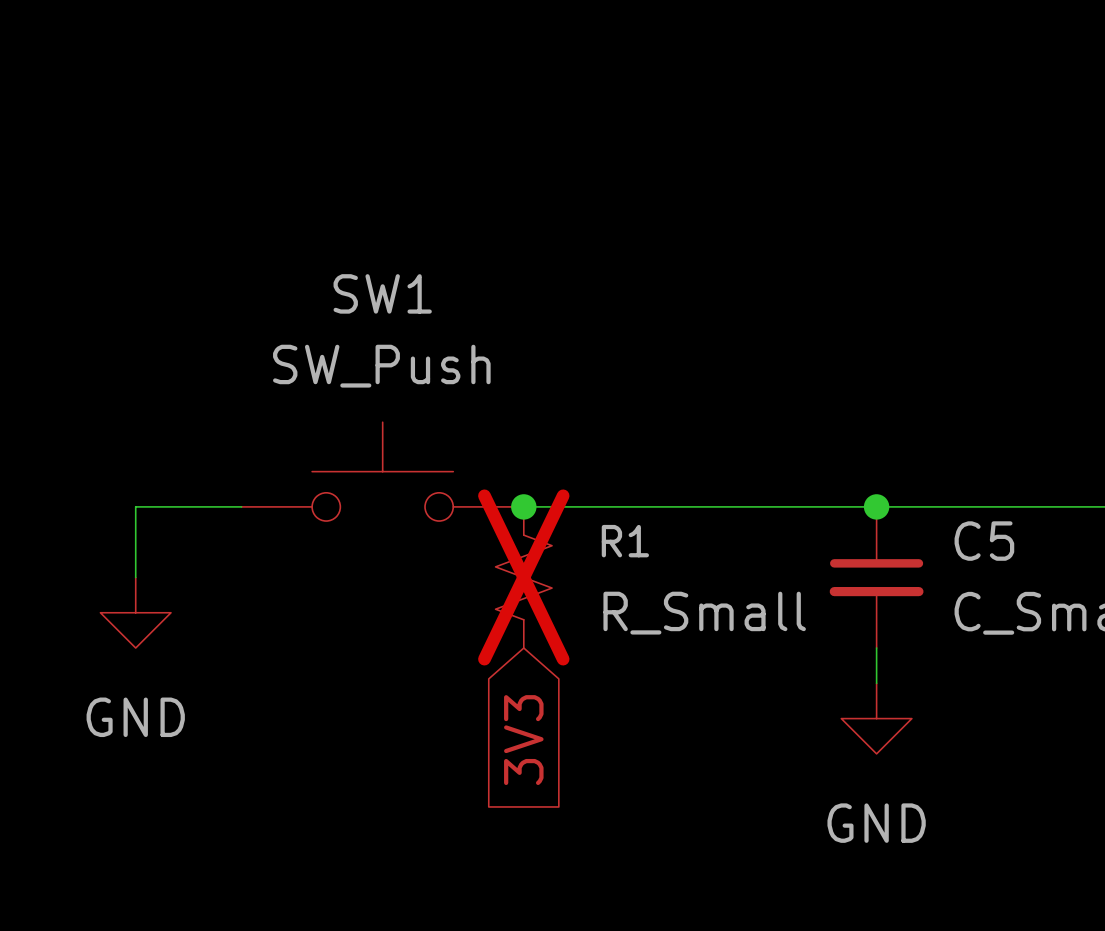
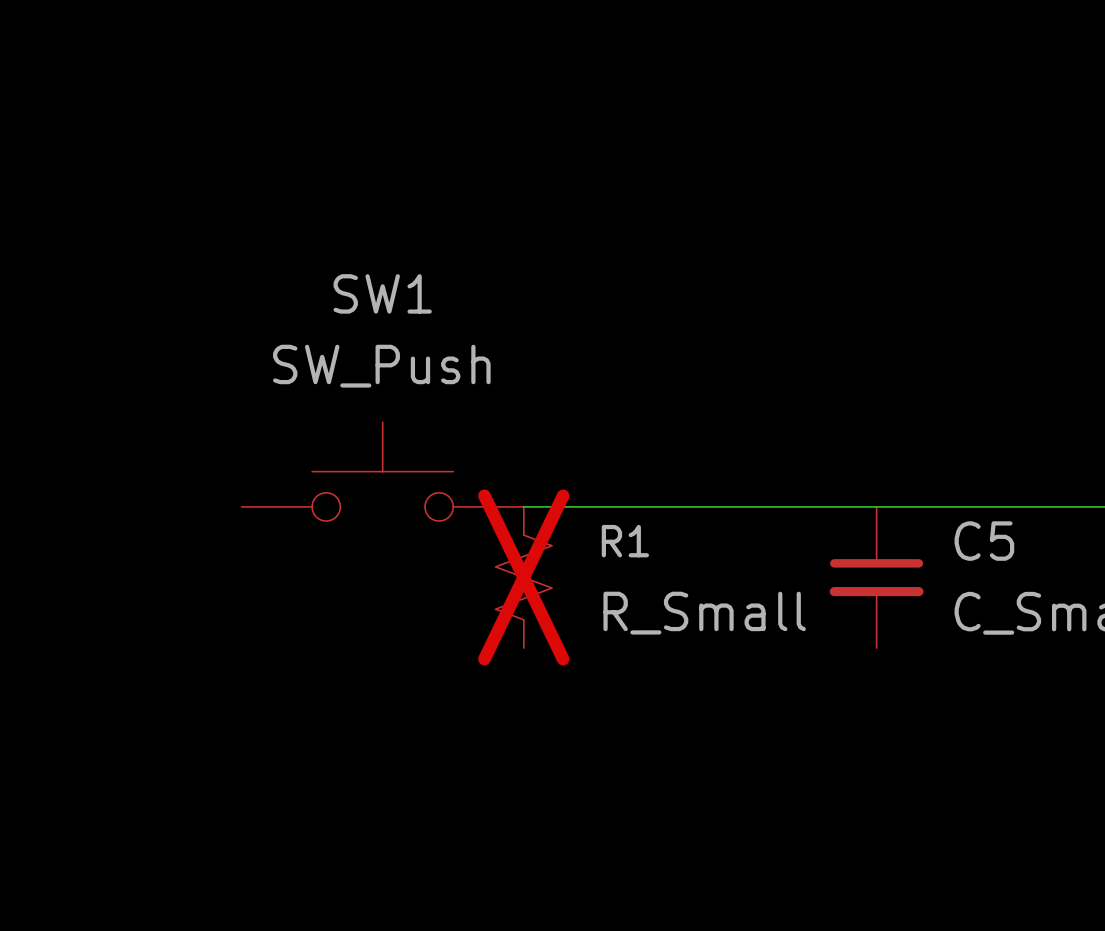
wire: (241, 506) (135, 506) (135, 577) -> none
junction: (523, 506) -> none
junction: (876, 506) -> none
power symbol: GND (135, 612) -> none
wire: (876, 648) (876, 683) -> none
power symbol: GND (876, 718) -> none
global label: 3V3 (523, 740) -> none

